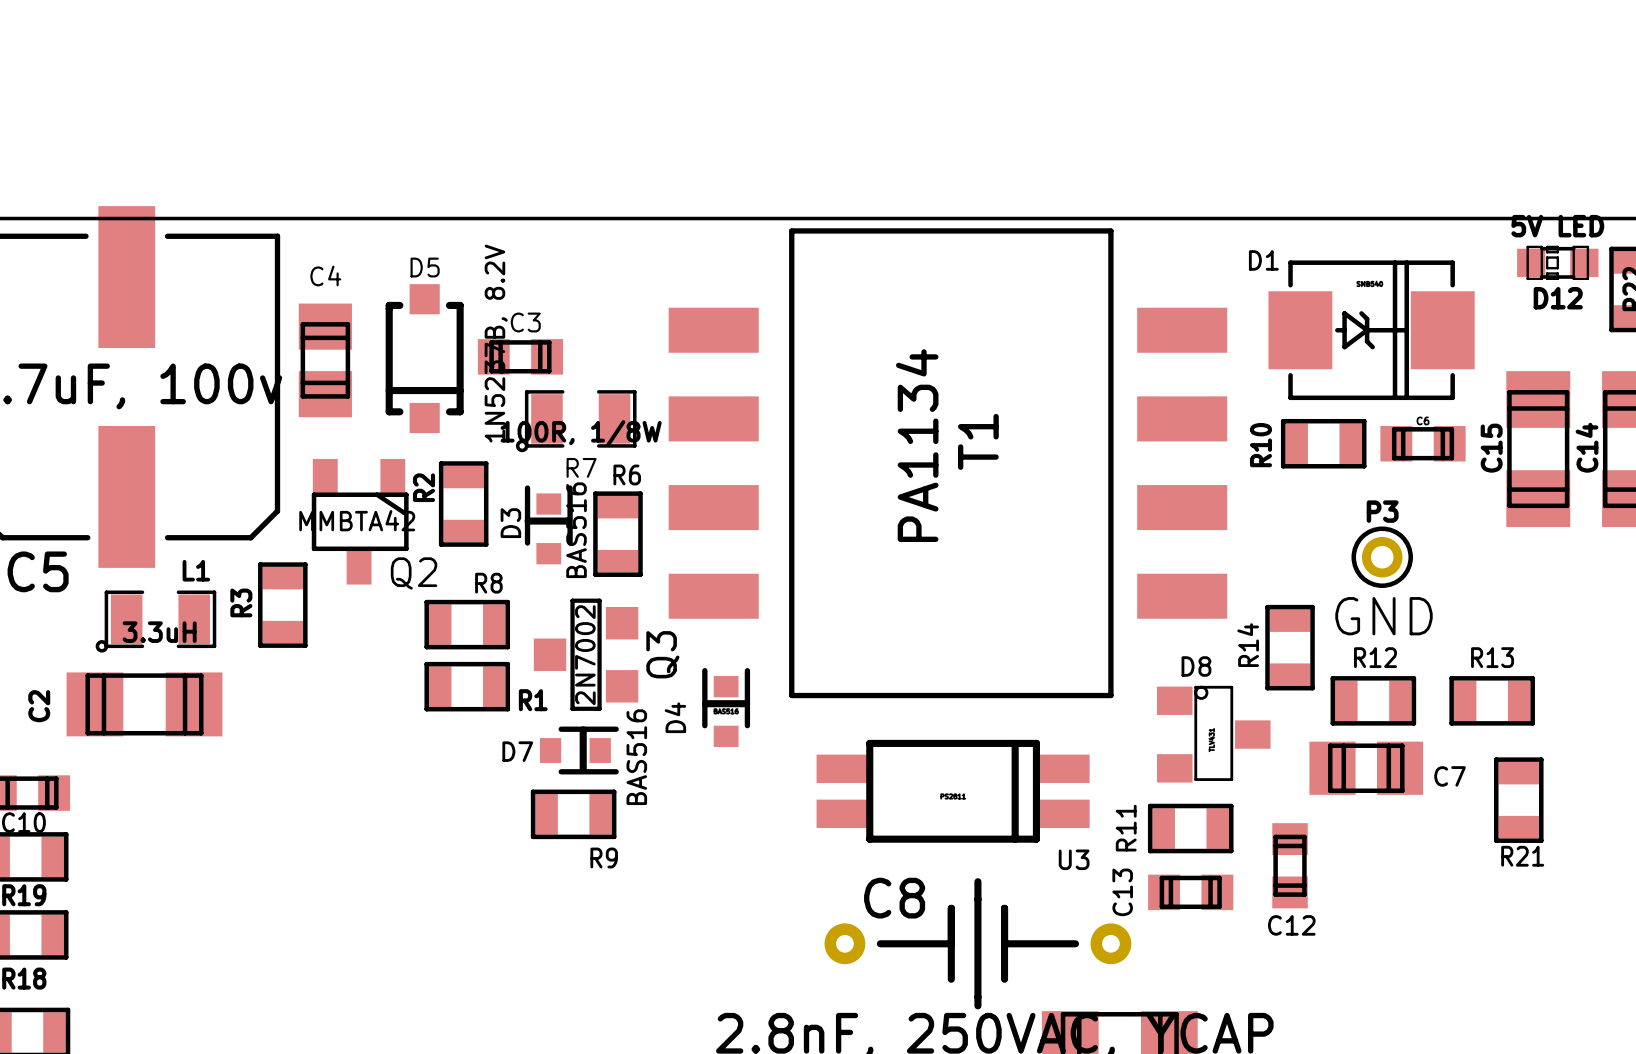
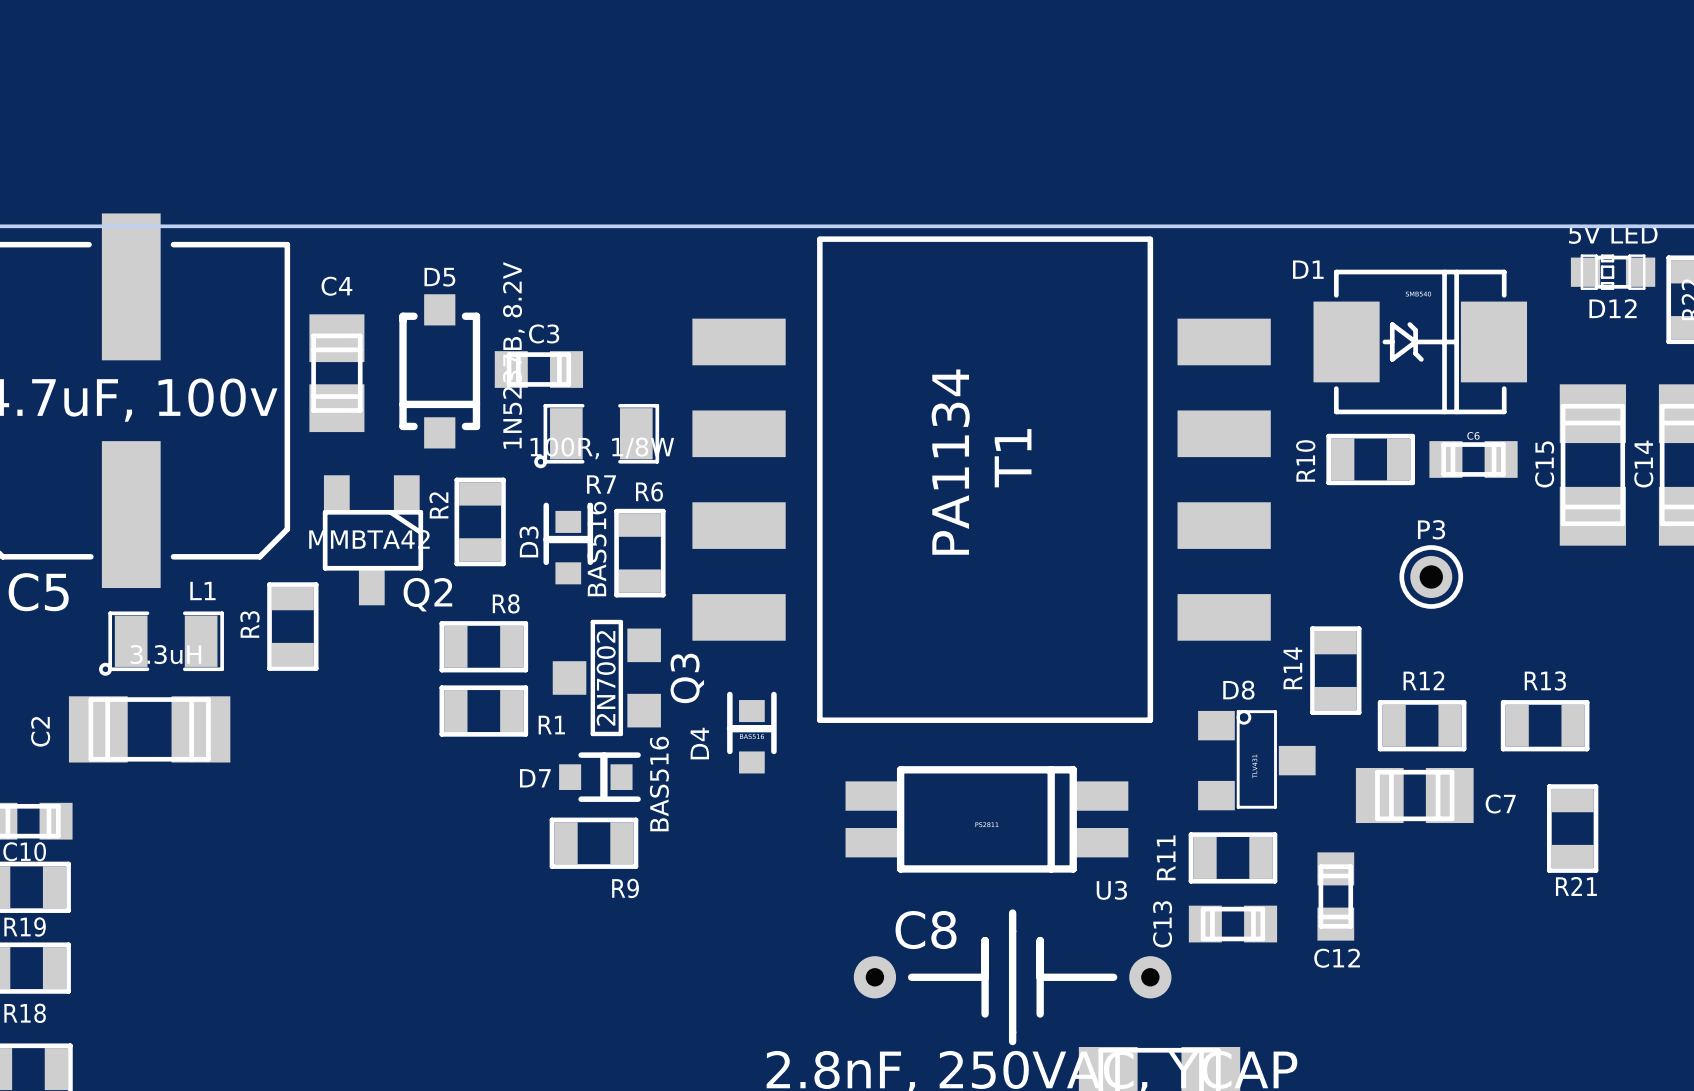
text: GND (1384, 616) -> none

